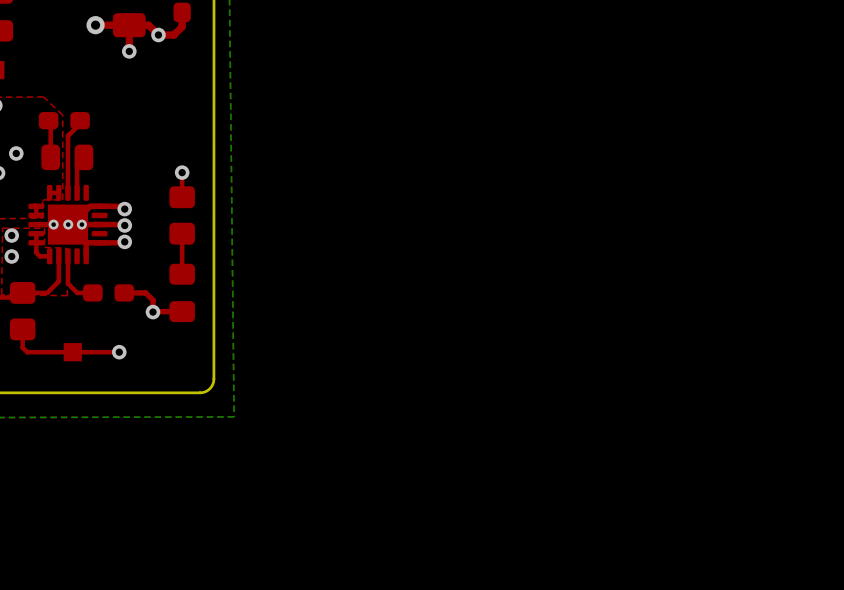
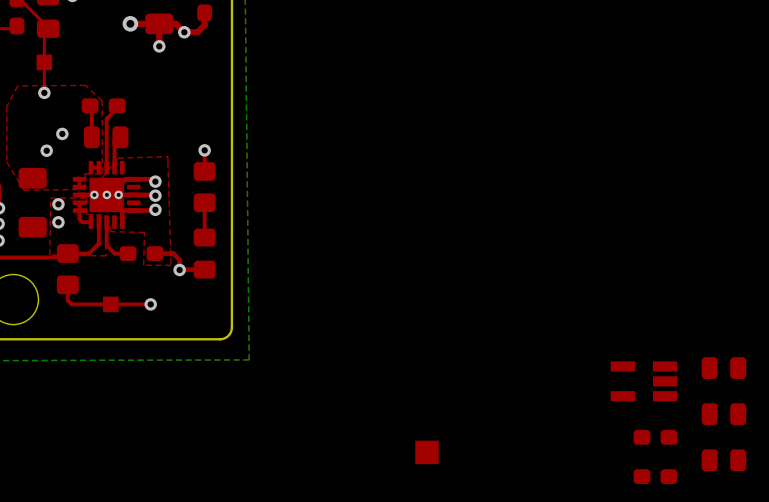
top zone outline: none -> (167, 156) (117, 158) (101, 178) (110, 231) (144, 232) (143, 265) (171, 265) (167, 156)
part: none -> (723, 368)
part: none -> (644, 381)
part: none -> (723, 414)
part: none -> (655, 437)
part: none -> (426, 452)
part: none -> (723, 460)
part: none -> (655, 476)

